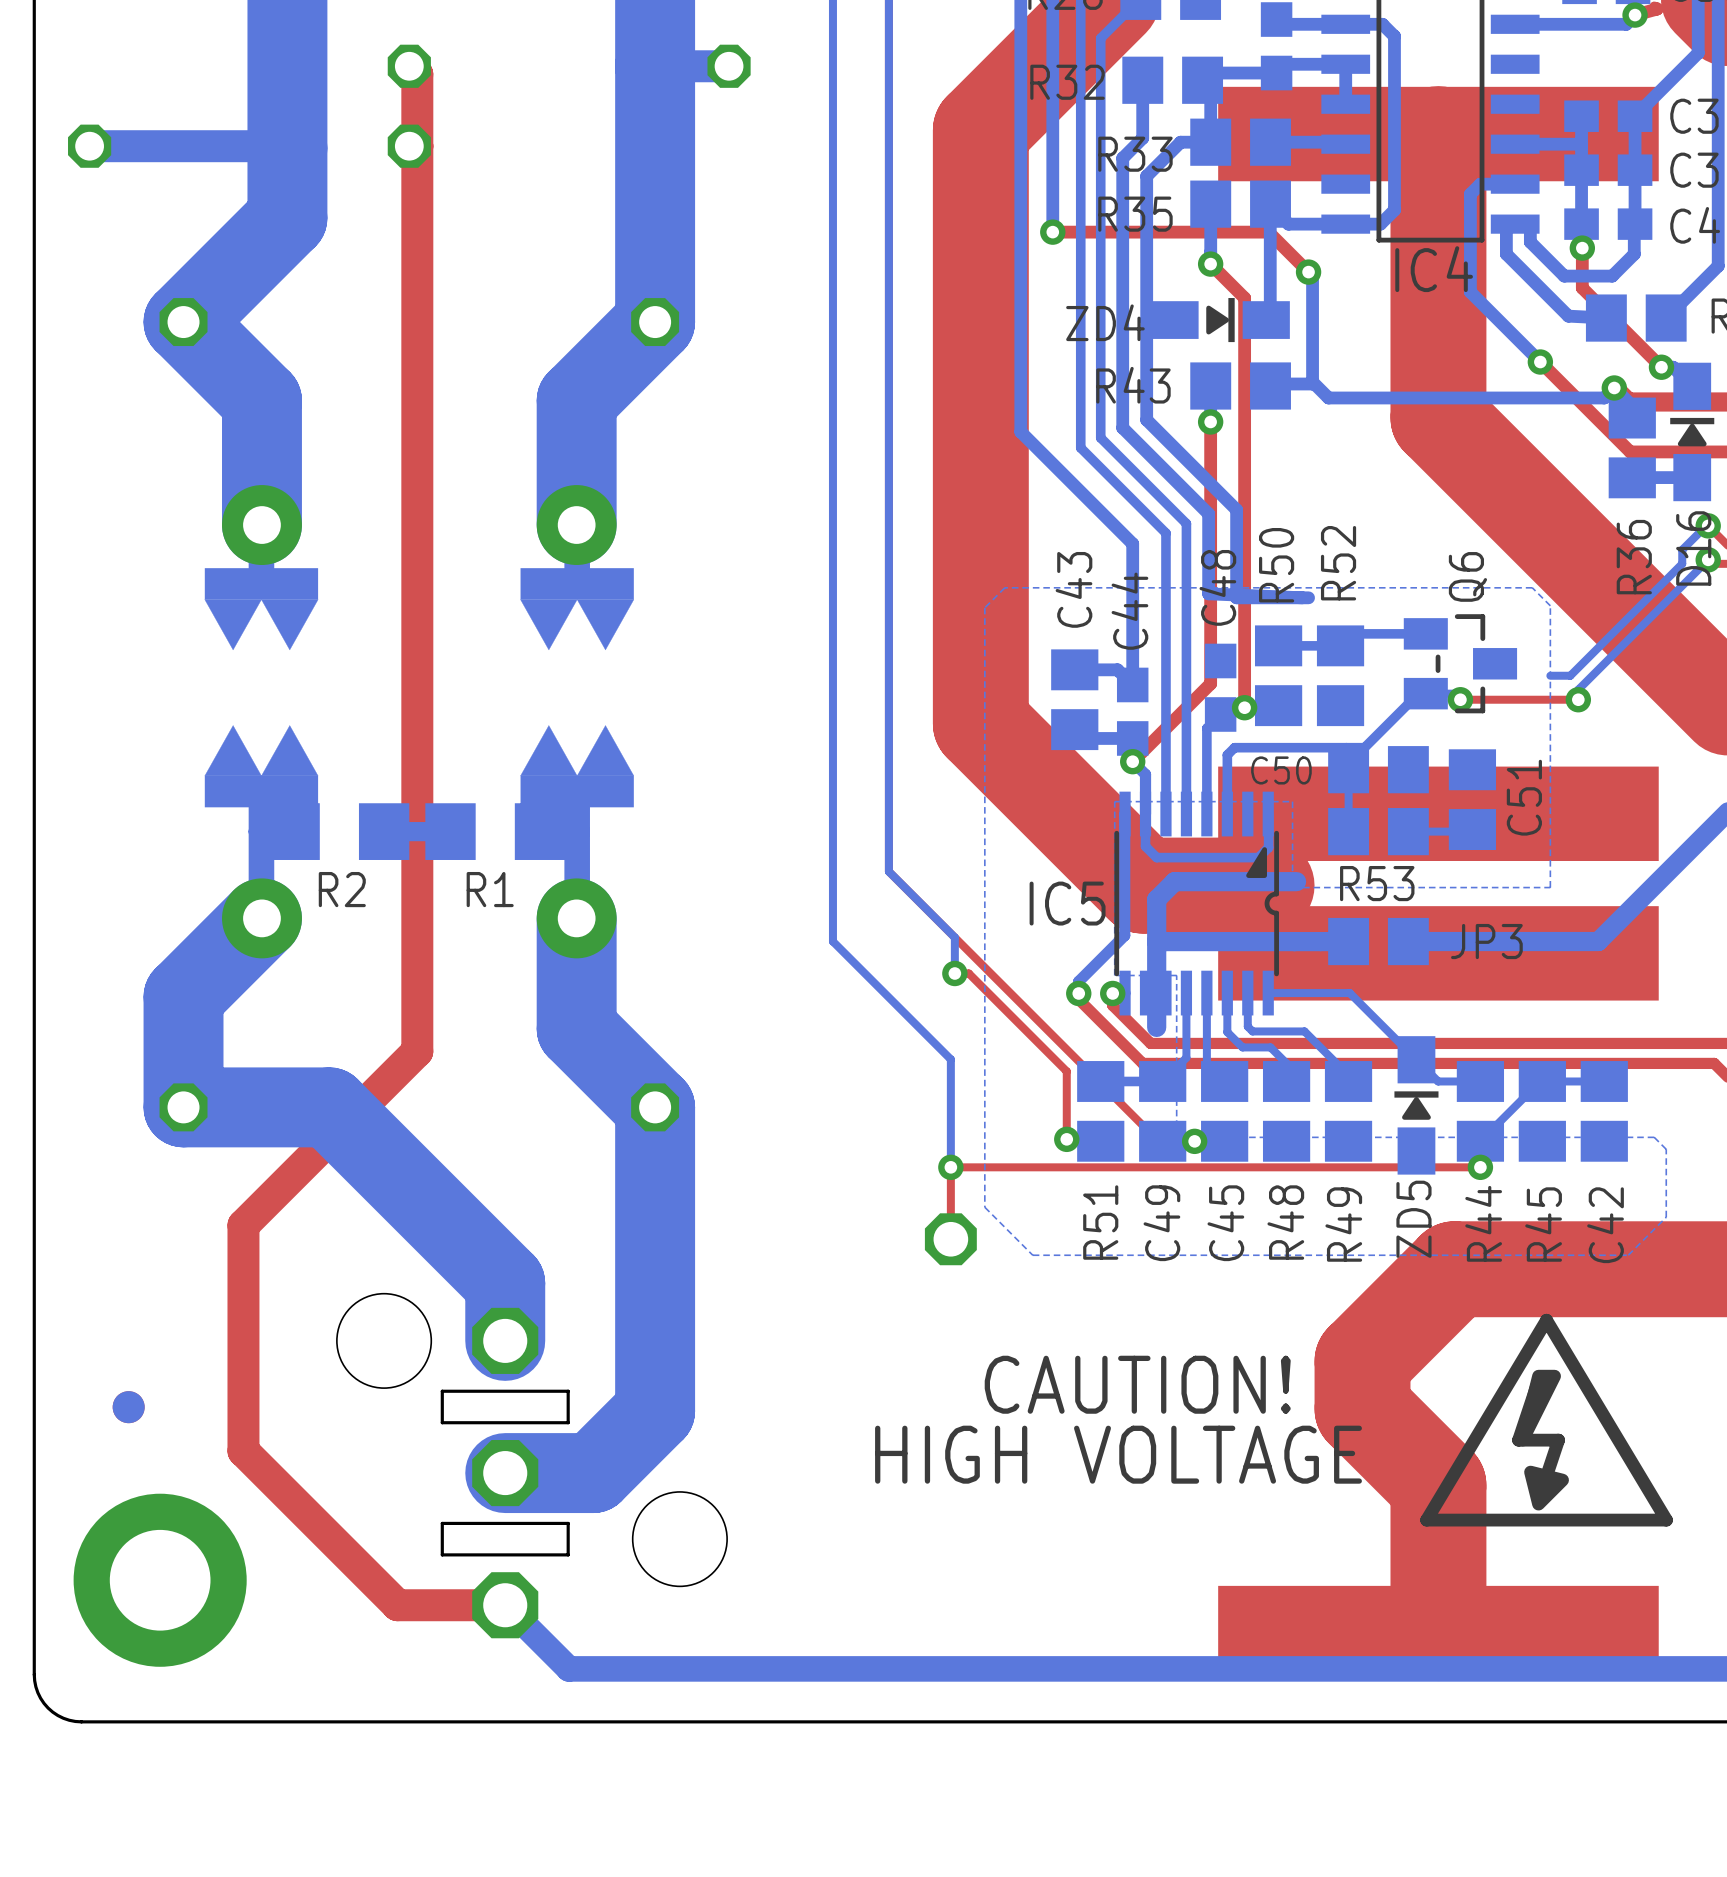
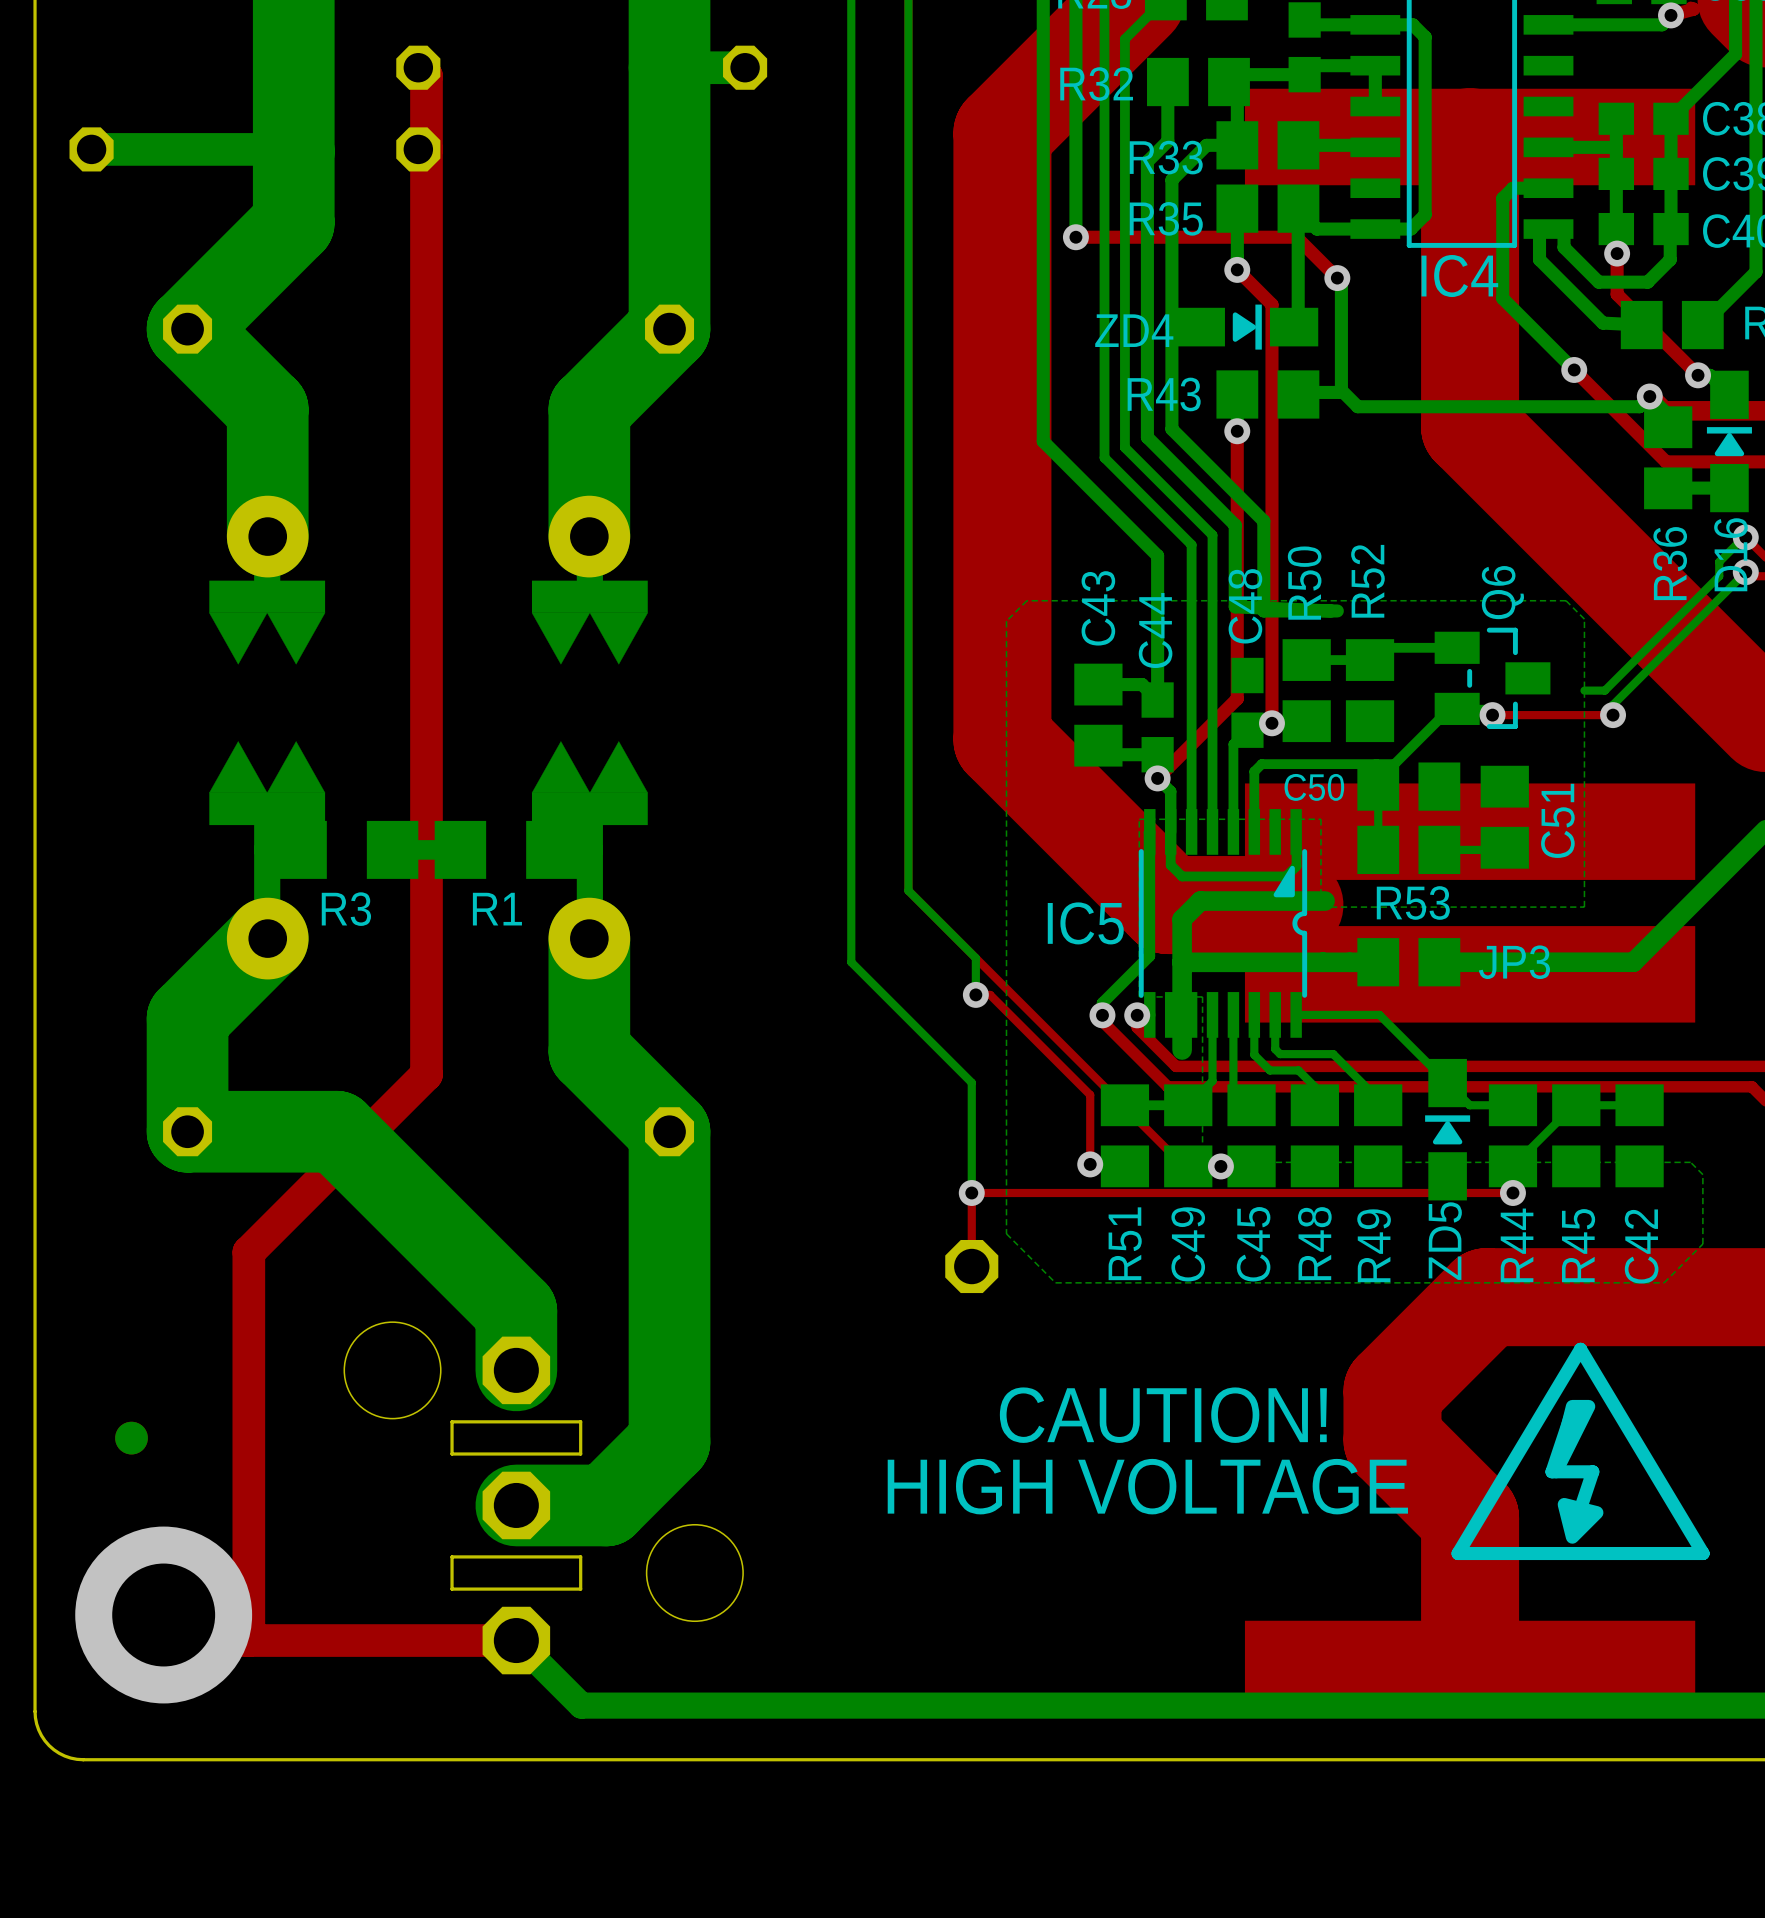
R2 name: R2 (342, 889) -> R3 (346, 909)
top track: (243, 1451) (397, 1605) -> (163, 1615) (189, 1640) (406, 1640)
top track: none -> (248, 1483) (248, 1640)

